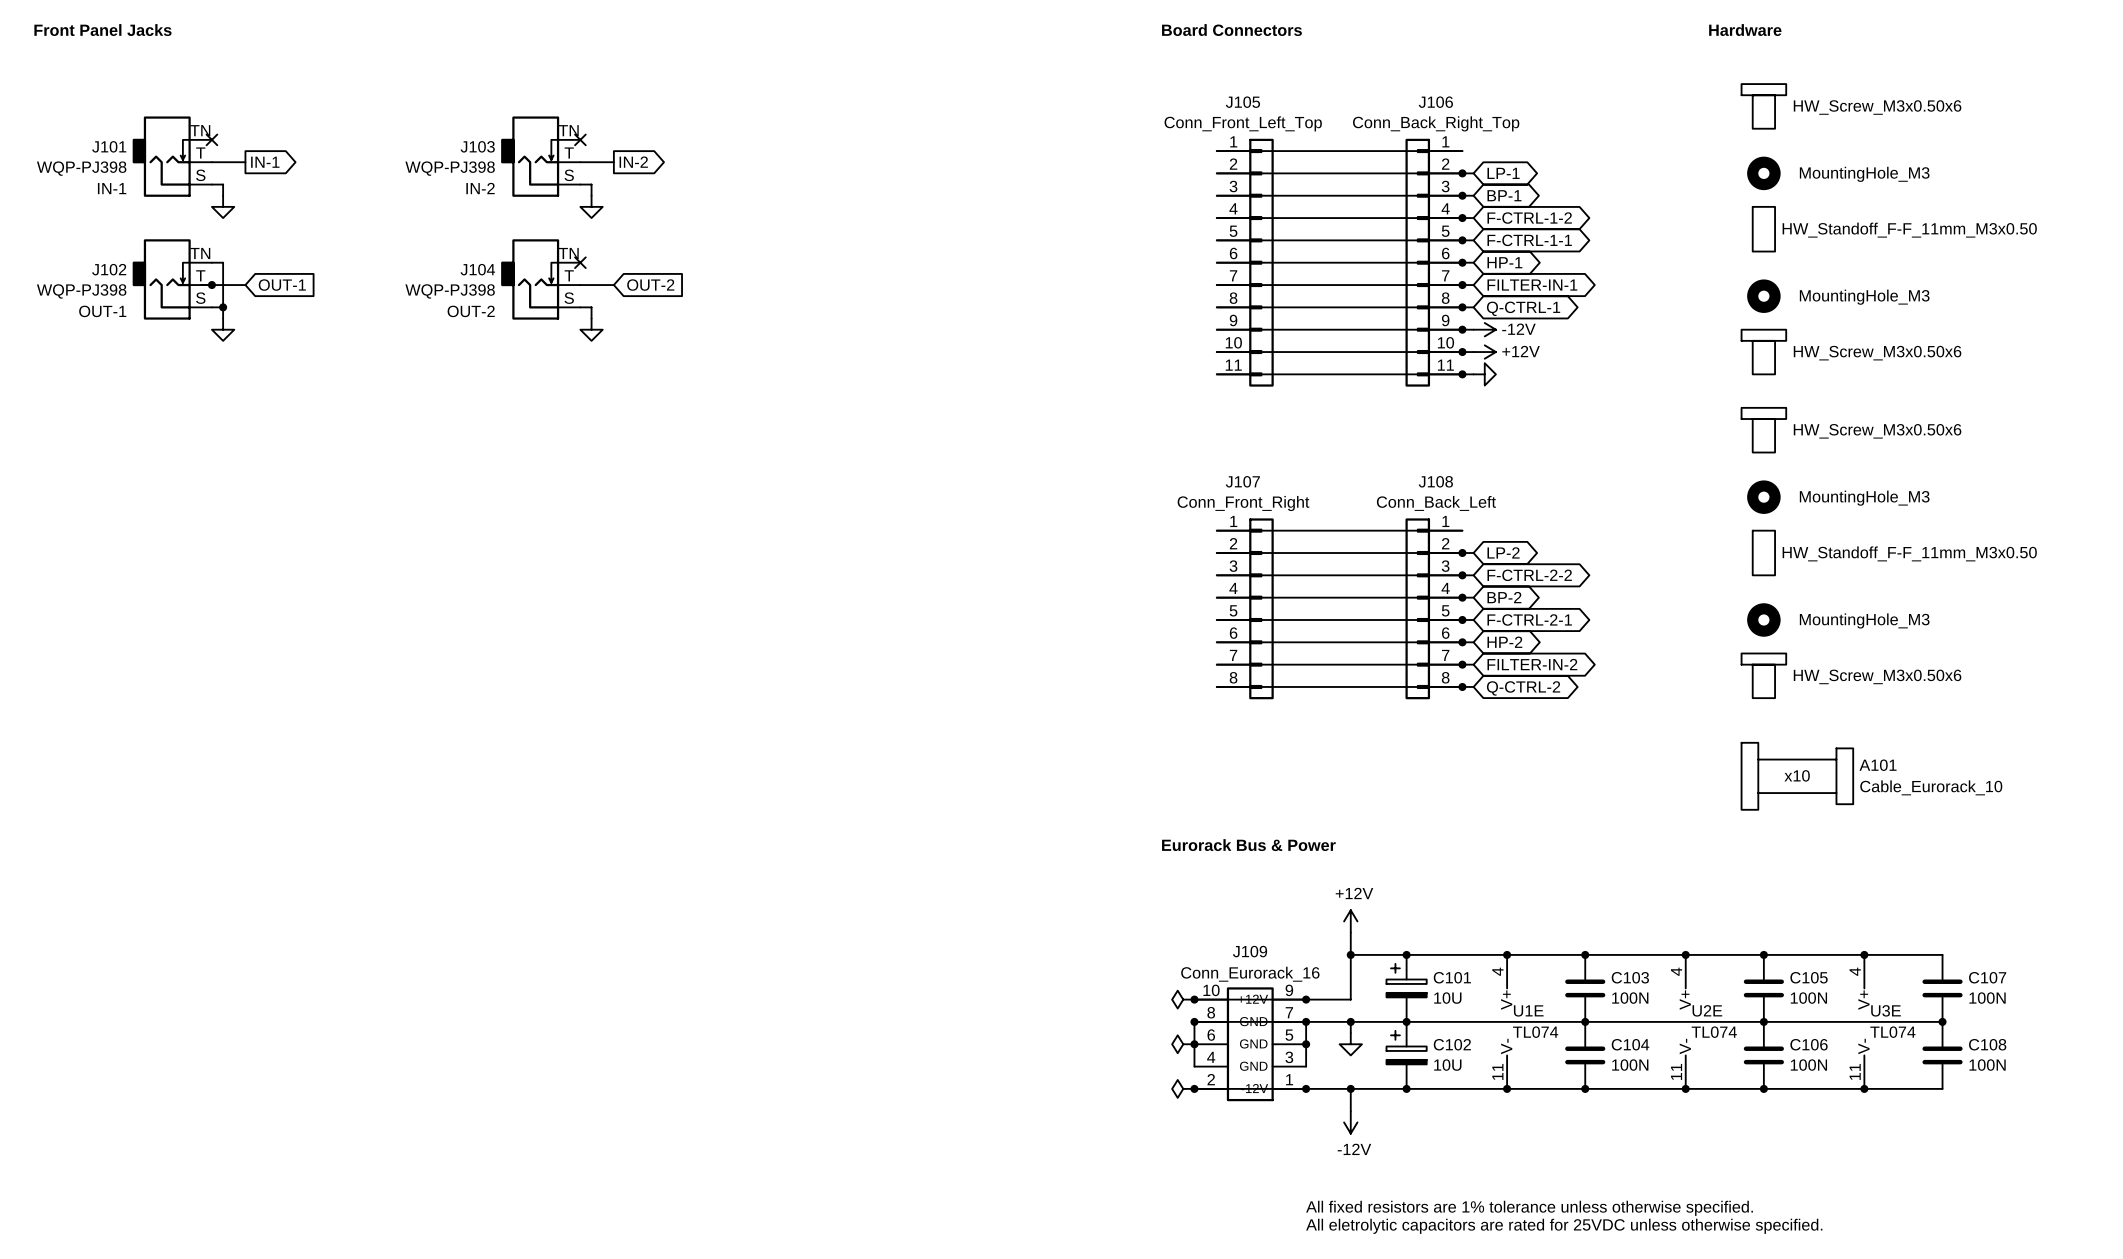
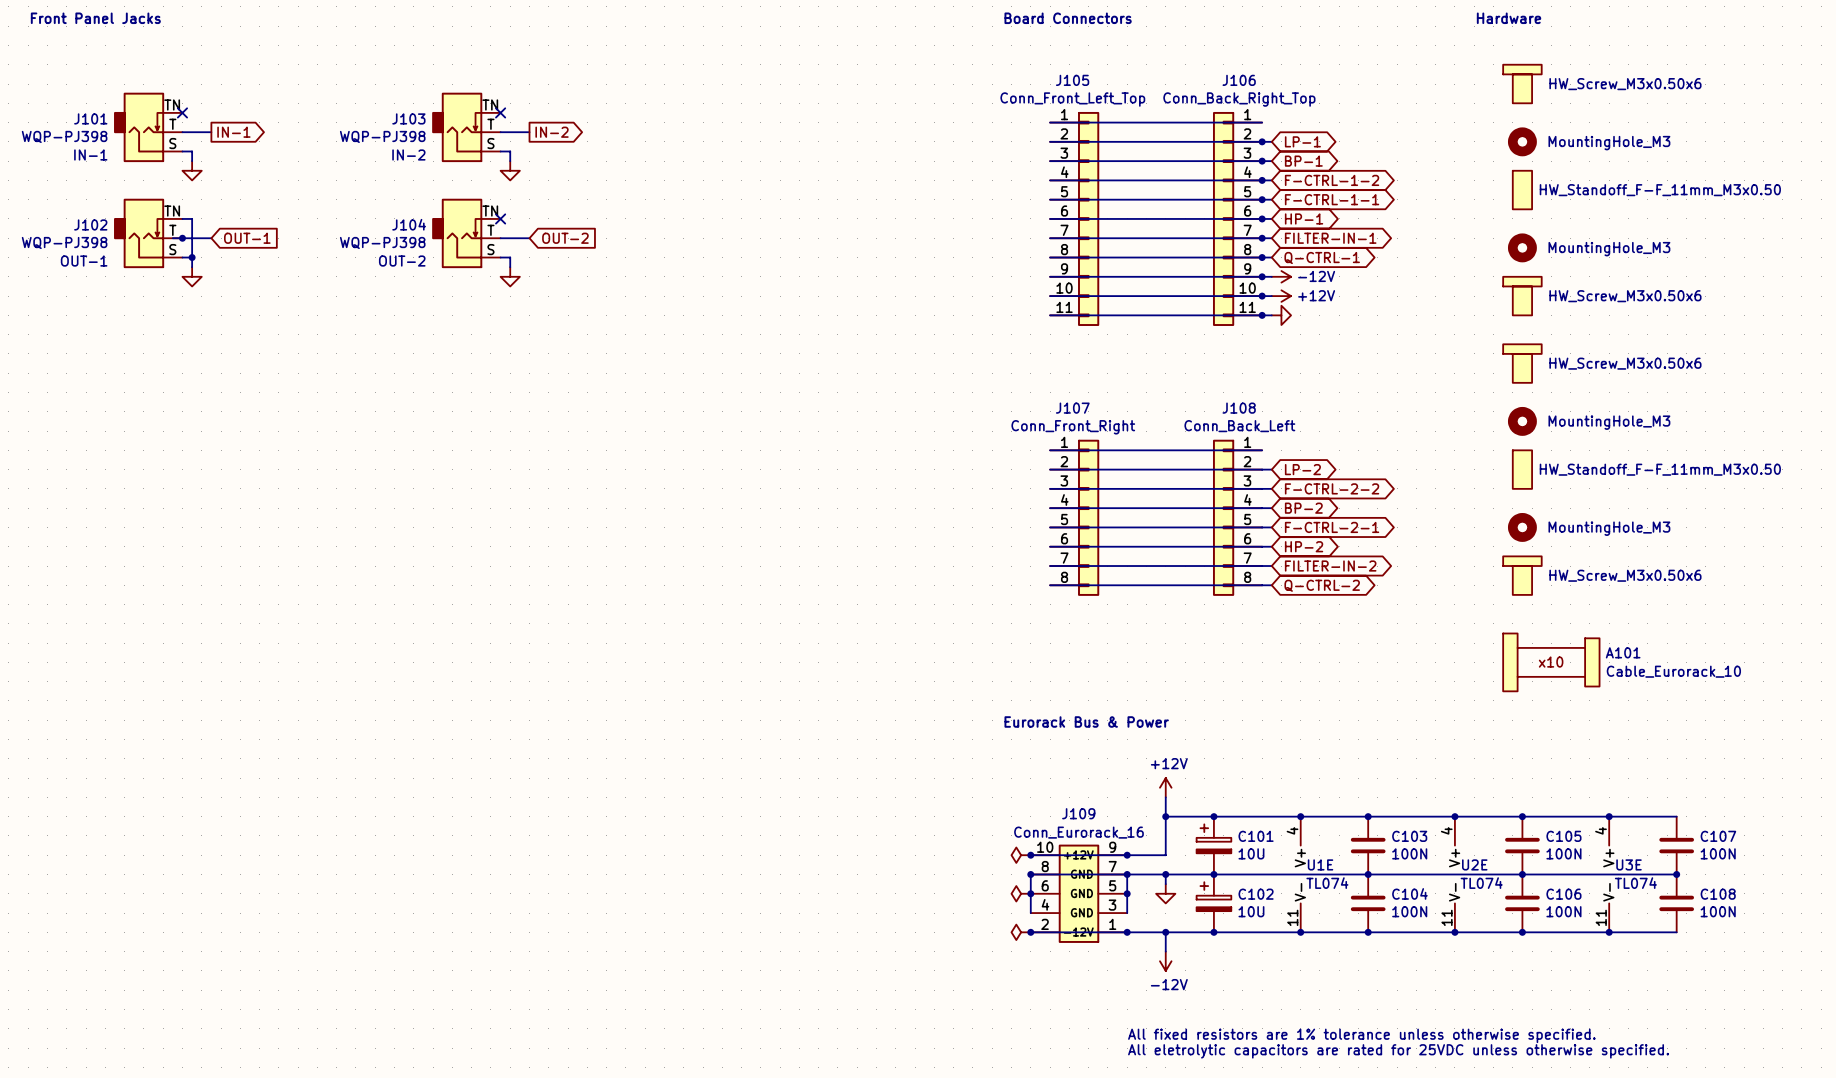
junction: (1462, 553) -> none
junction: (1462, 575) -> none
junction: (1462, 597) -> none
junction: (1462, 619) -> none
junction: (1462, 642) -> none
junction: (1462, 664) -> none
junction: (1462, 686) -> none

